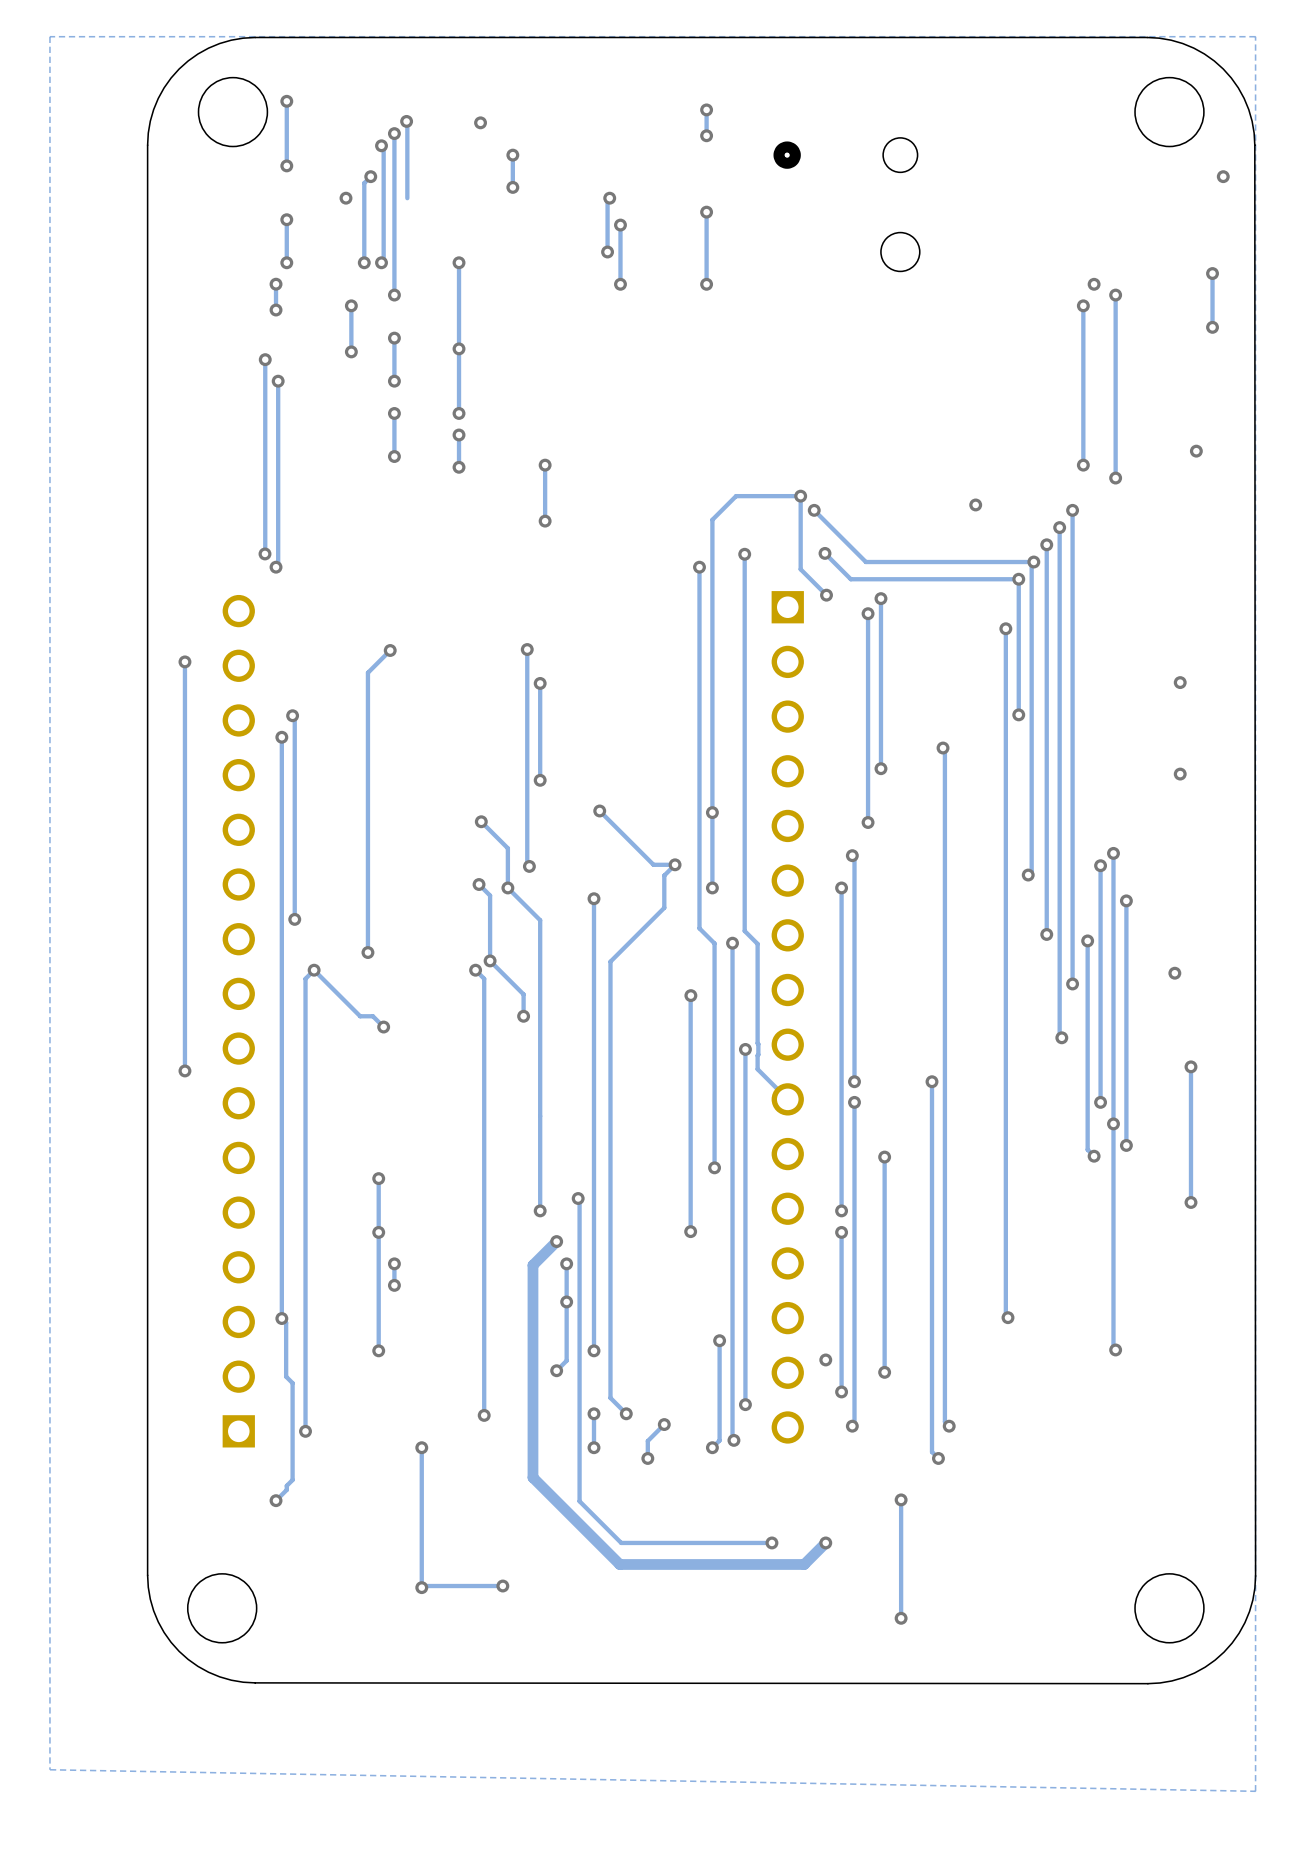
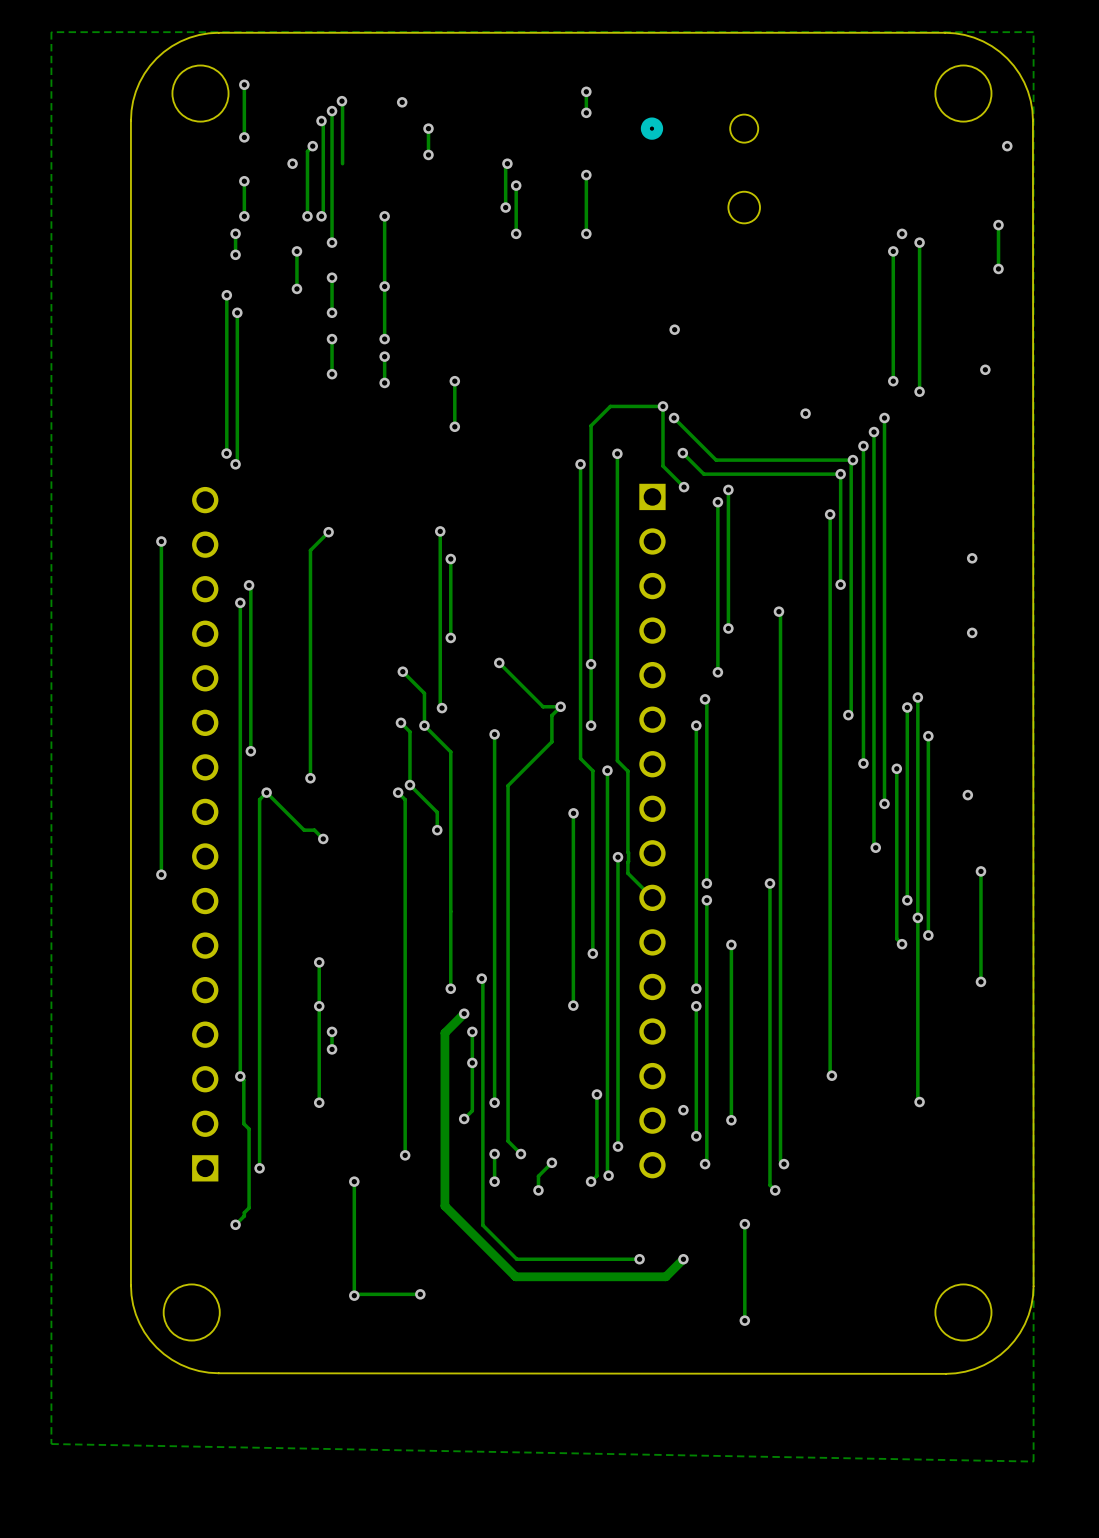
via: none -> (674, 329)

